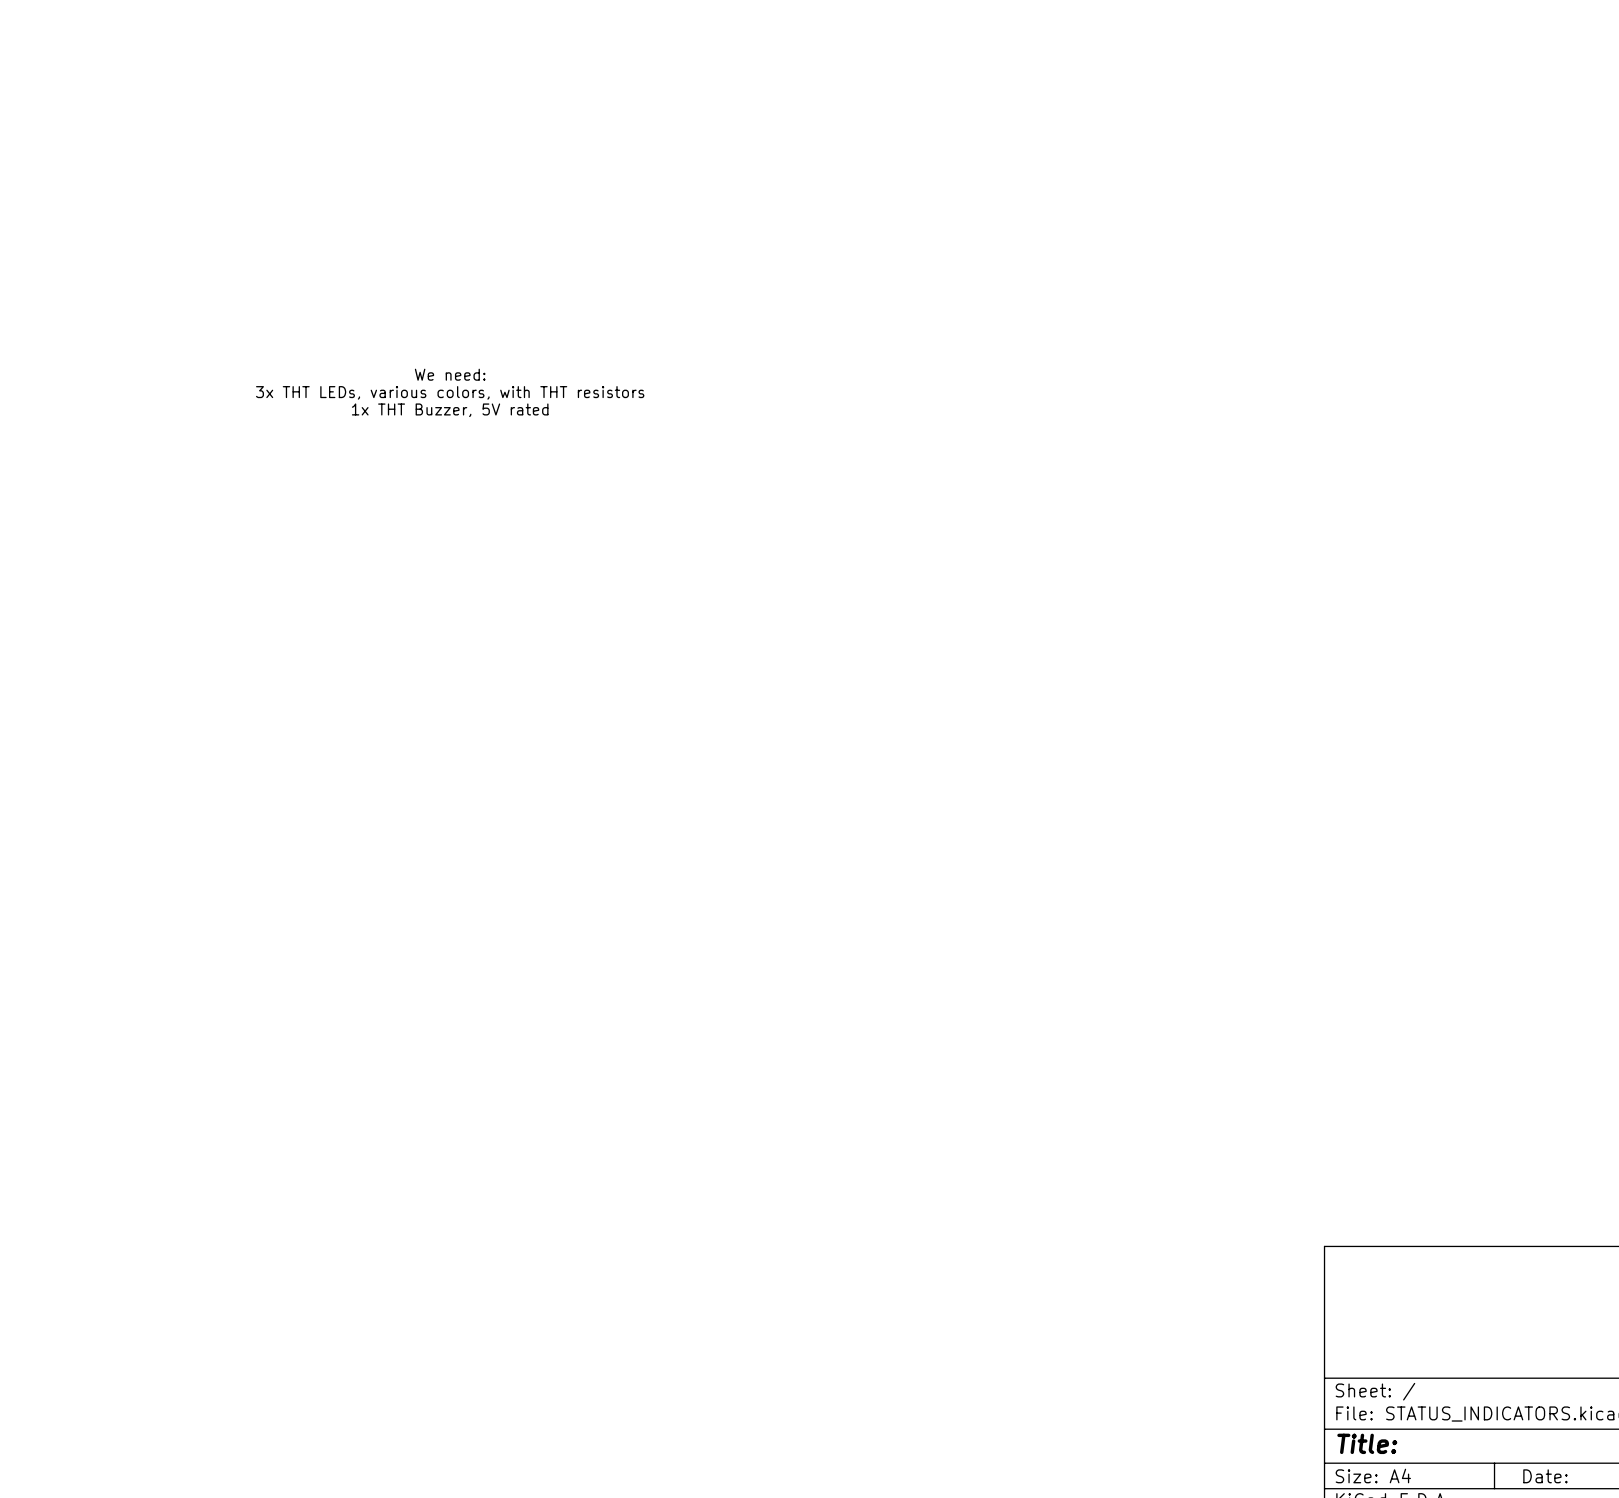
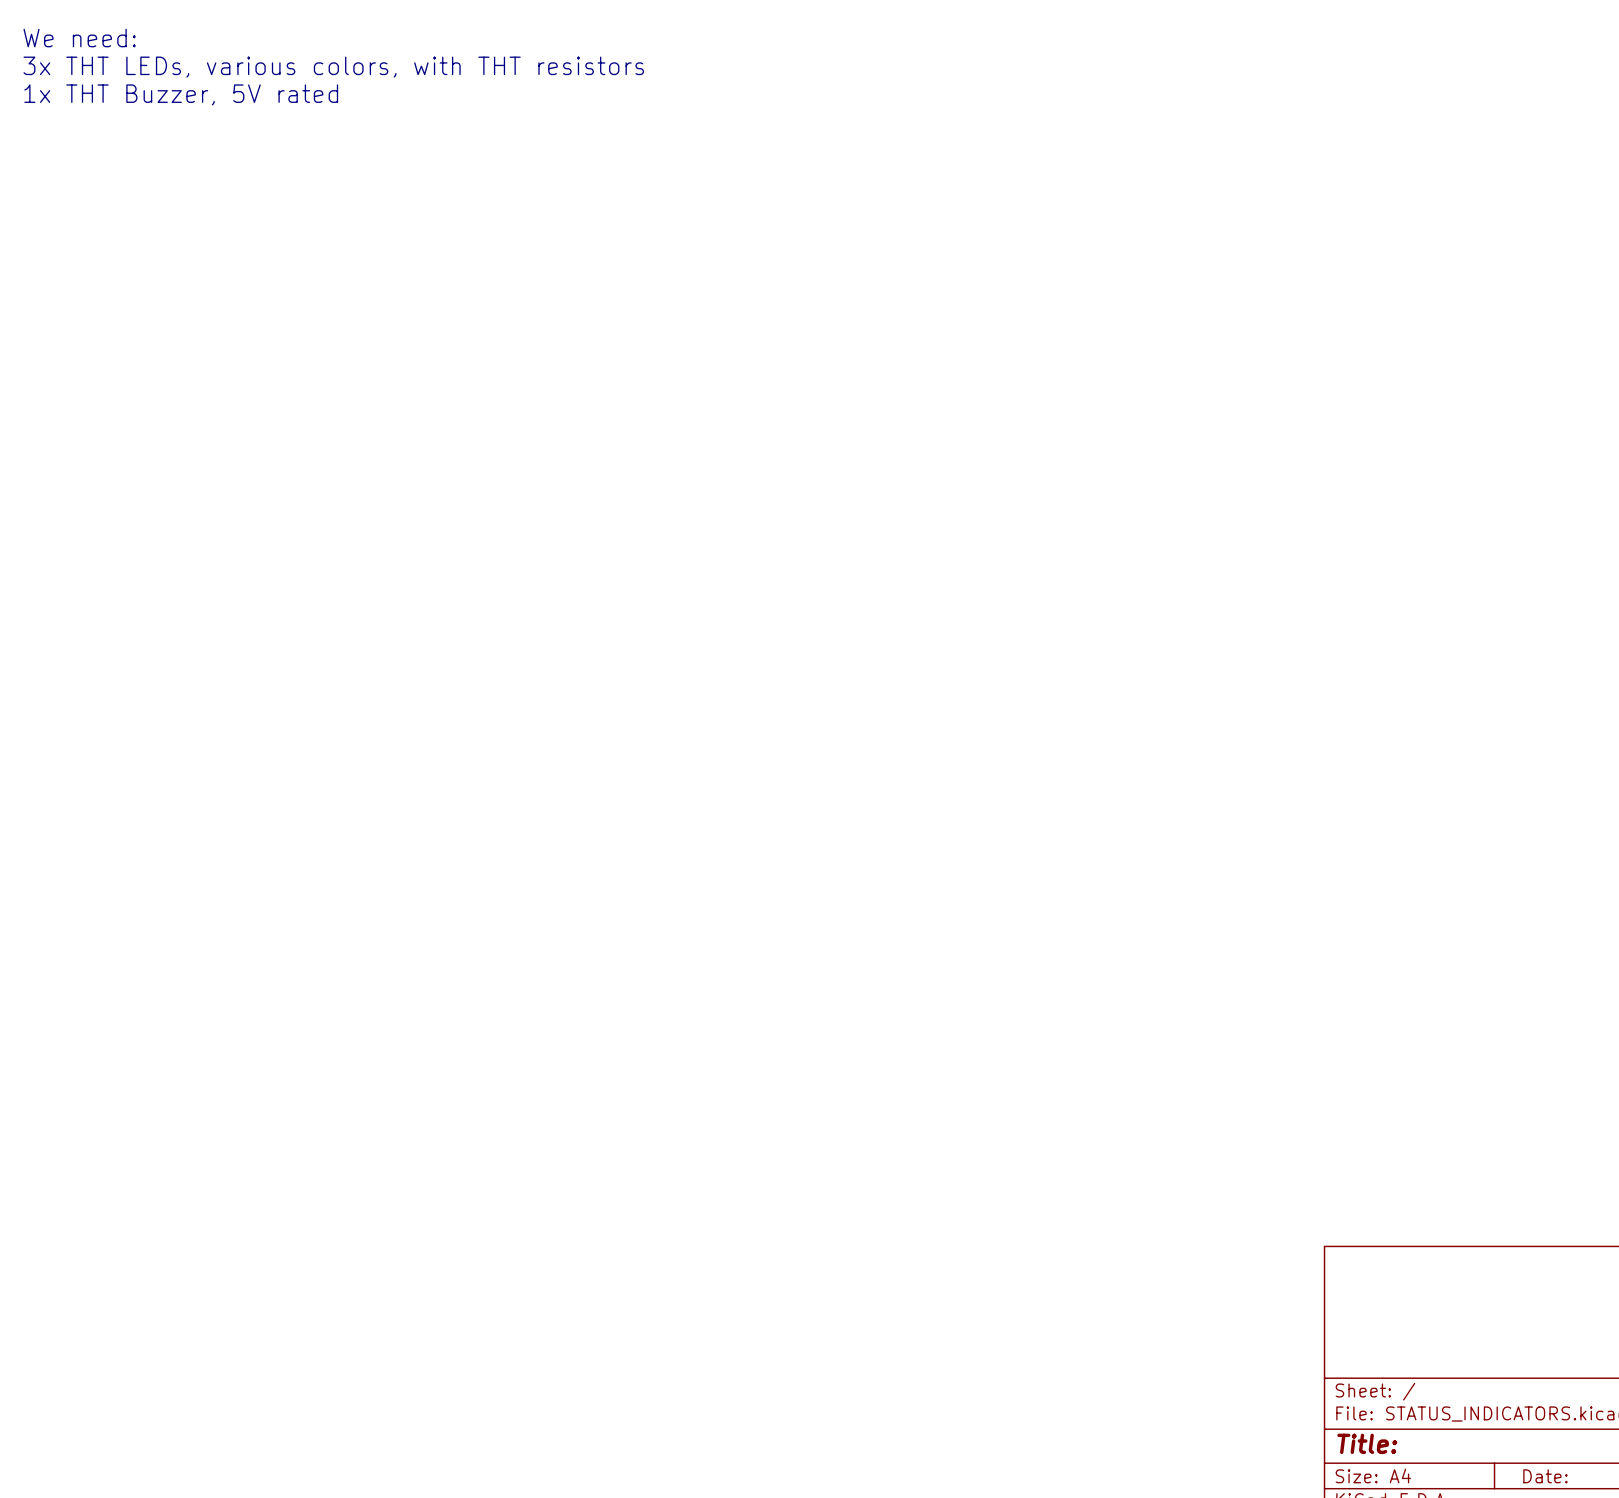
text: none -> We need: (79, 38)
text: none -> 3x THT LEDs, various colors, with THT resistors (333, 67)
text: none -> 1x THT Buzzer, 5V rated (181, 94)
text: We need: (450, 374) -> none
text: 3x THT LEDs, various colors, with THT resistors (450, 392) -> none
text: 1x THT Buzzer, 5V rated (450, 410) -> none

